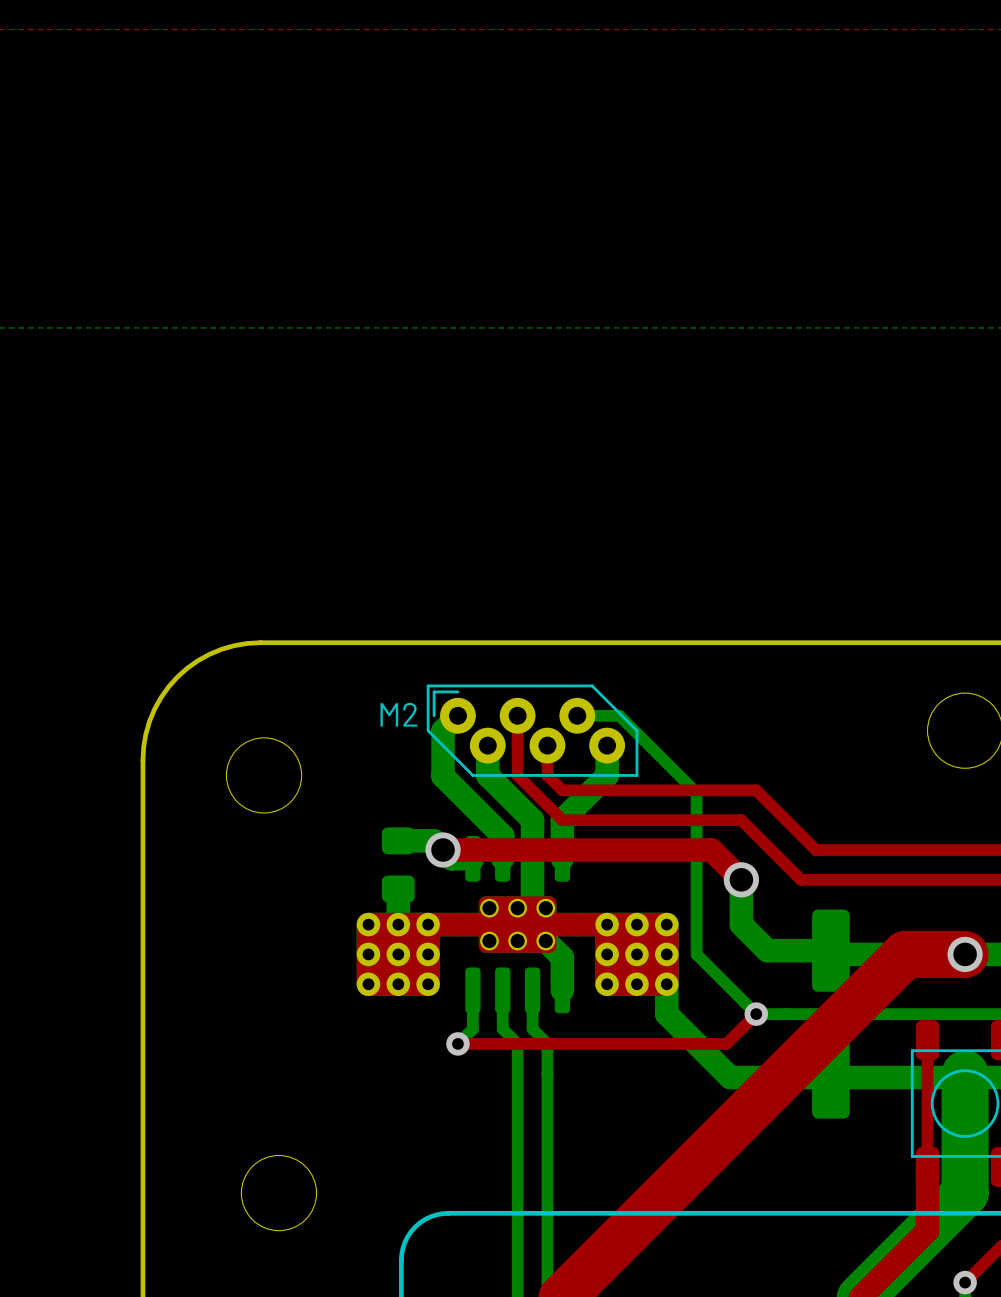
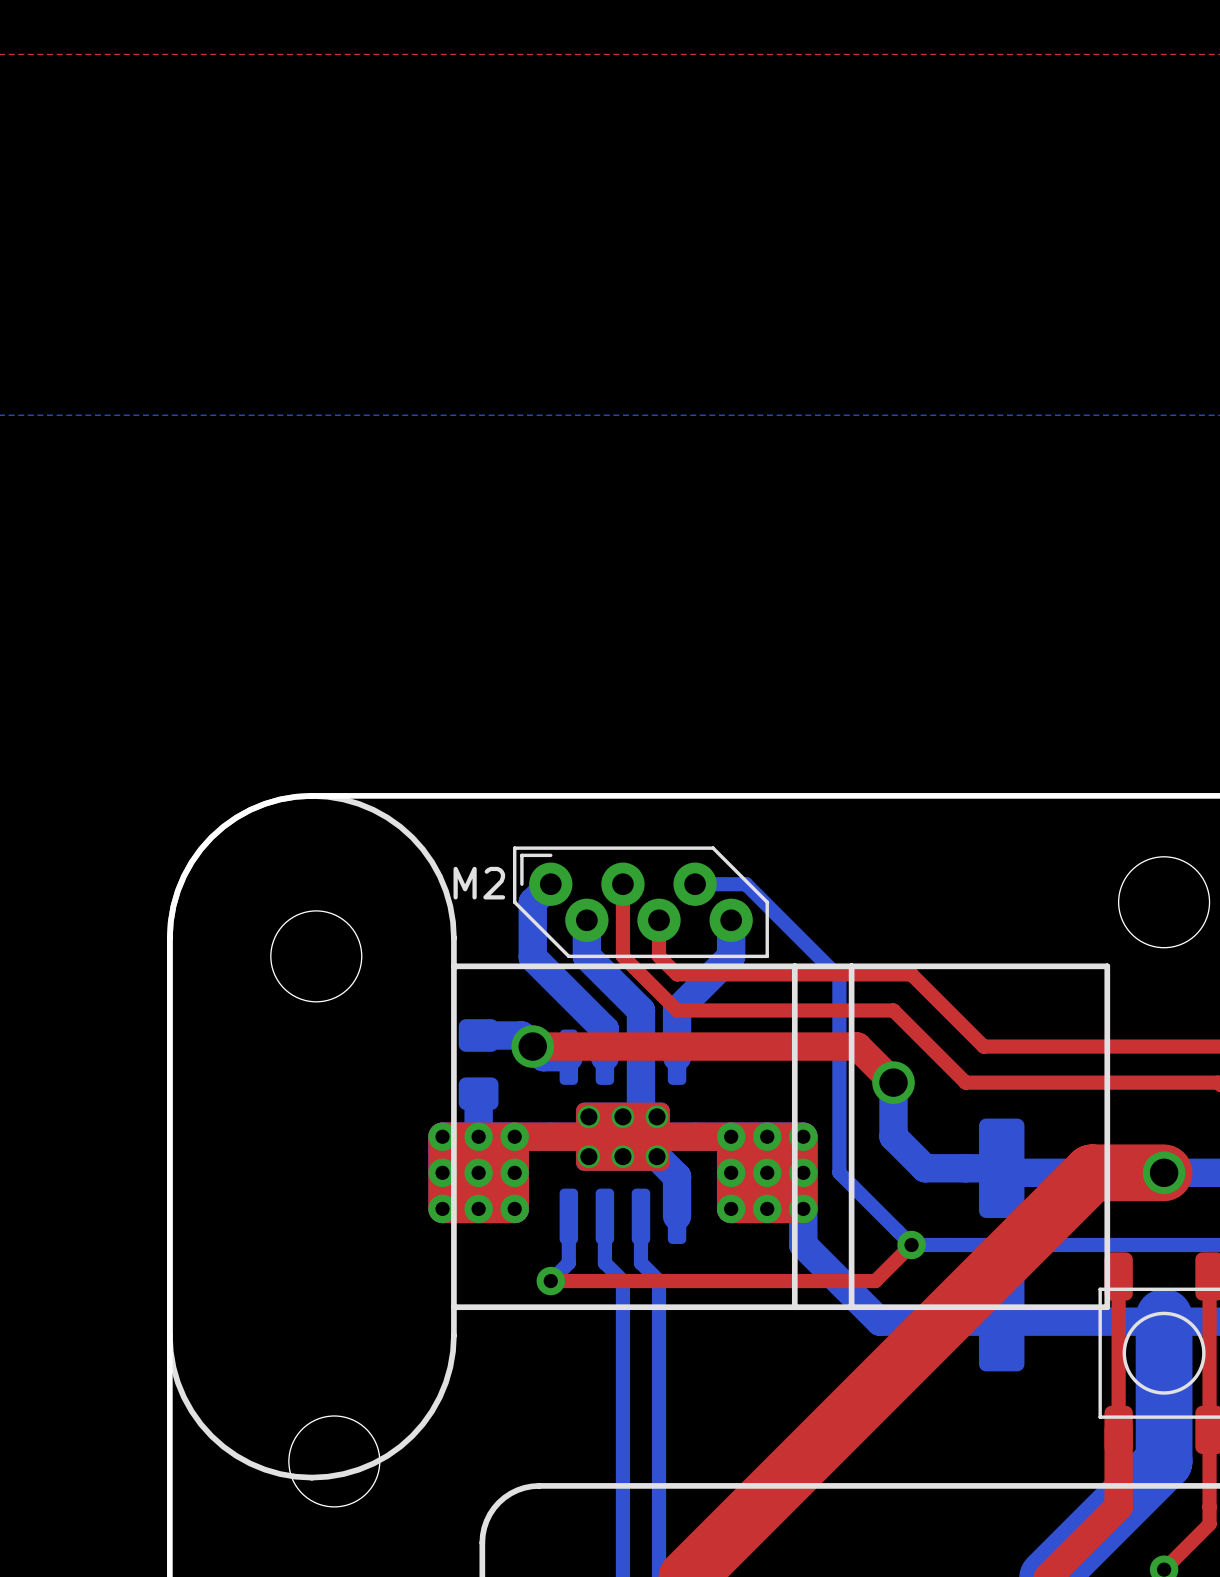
line: none -> (311, 795) (343, 799) (373, 809) (400, 826) (412, 837) (422, 849) (439, 876) (450, 906) (453, 937) (453, 1335) (450, 1367) (439, 1397) (432, 1411) (412, 1436) (400, 1446) (387, 1455) (358, 1469) (343, 1474) (311, 1477) (280, 1474) (264, 1469) (236, 1455) (211, 1436) (200, 1424) (183, 1397) (173, 1367) (169, 1335) (169, 937) (173, 906) (183, 876) (191, 862) (200, 849) (223, 826) (250, 809) (264, 803) (295, 796) (311, 795)
line: none -> (453, 966) (1107, 966) (1107, 1307) (453, 1307)
line: none -> (794, 966) (794, 1307)
line: none -> (851, 966) (851, 1307)

